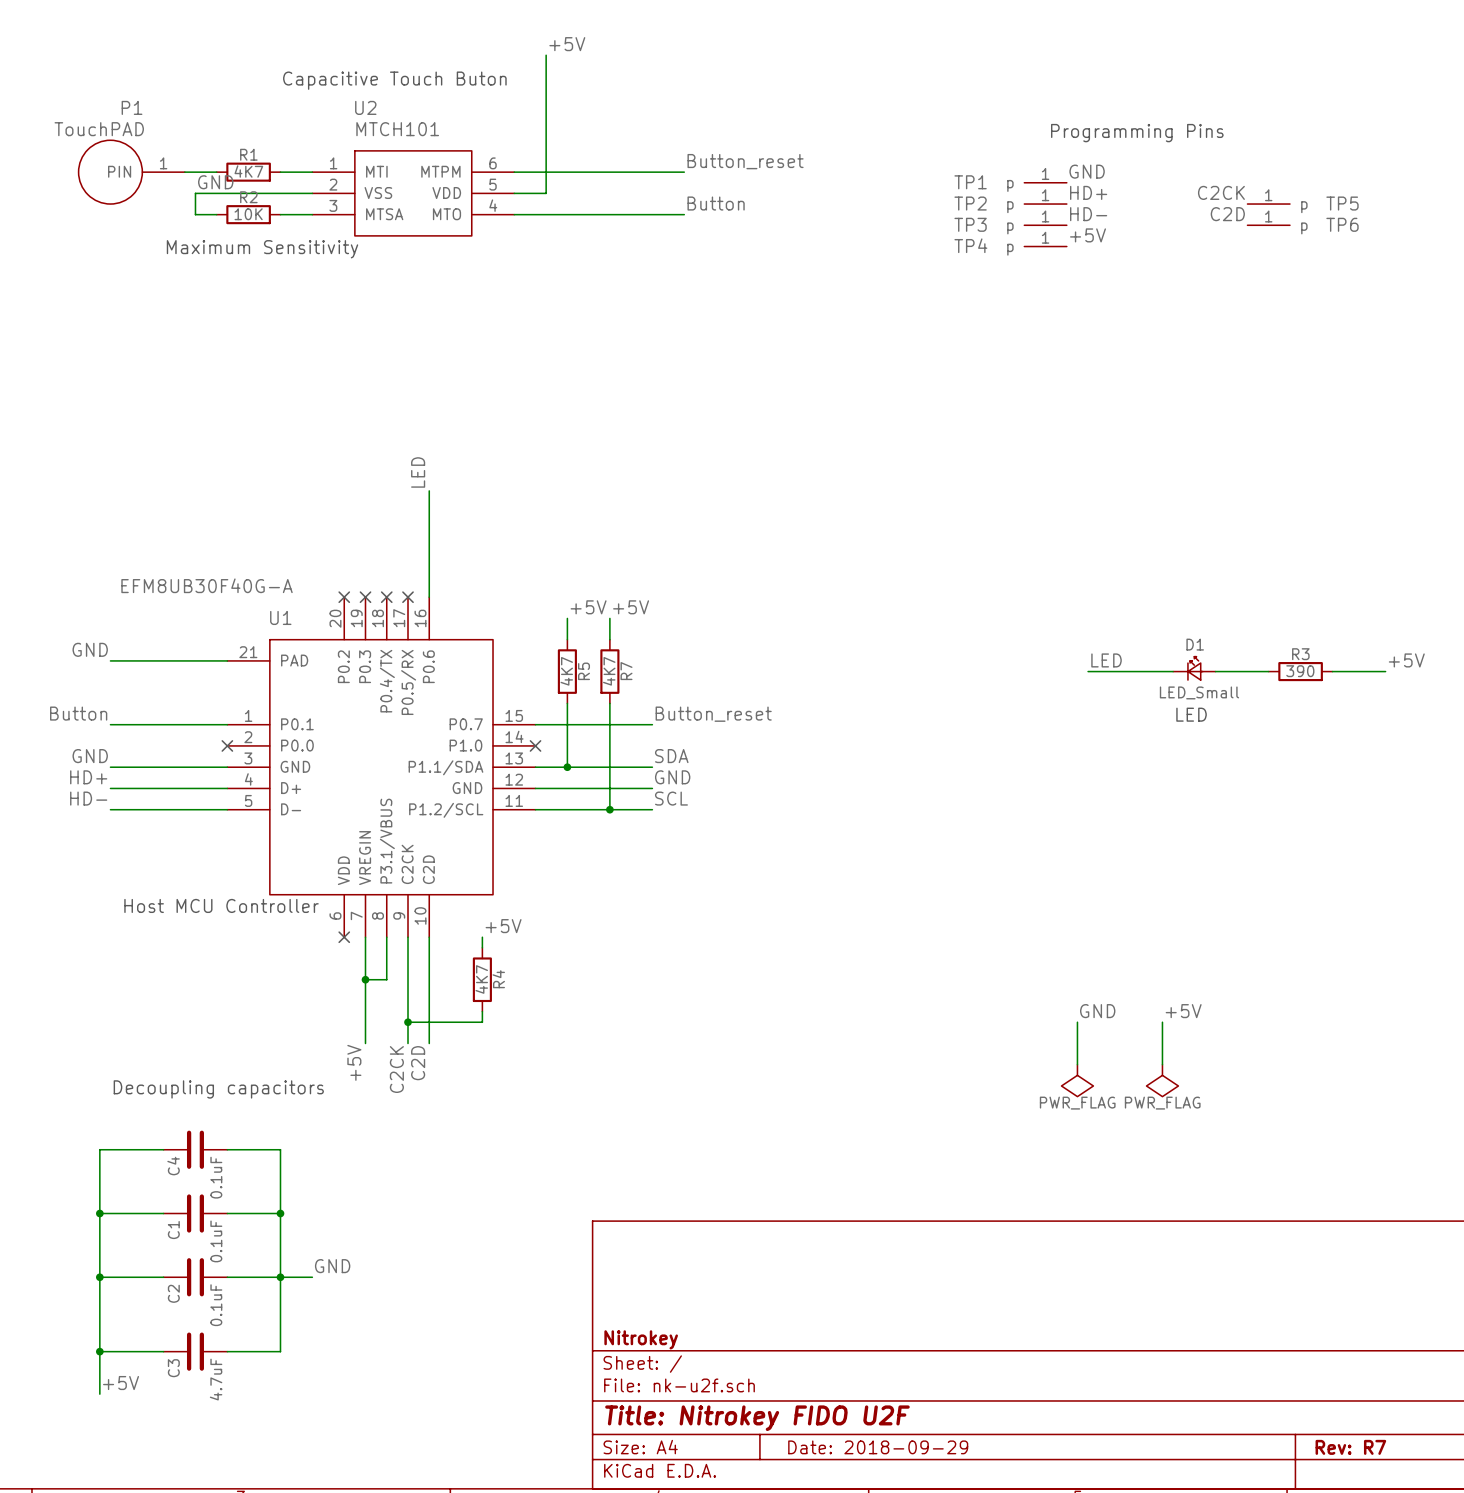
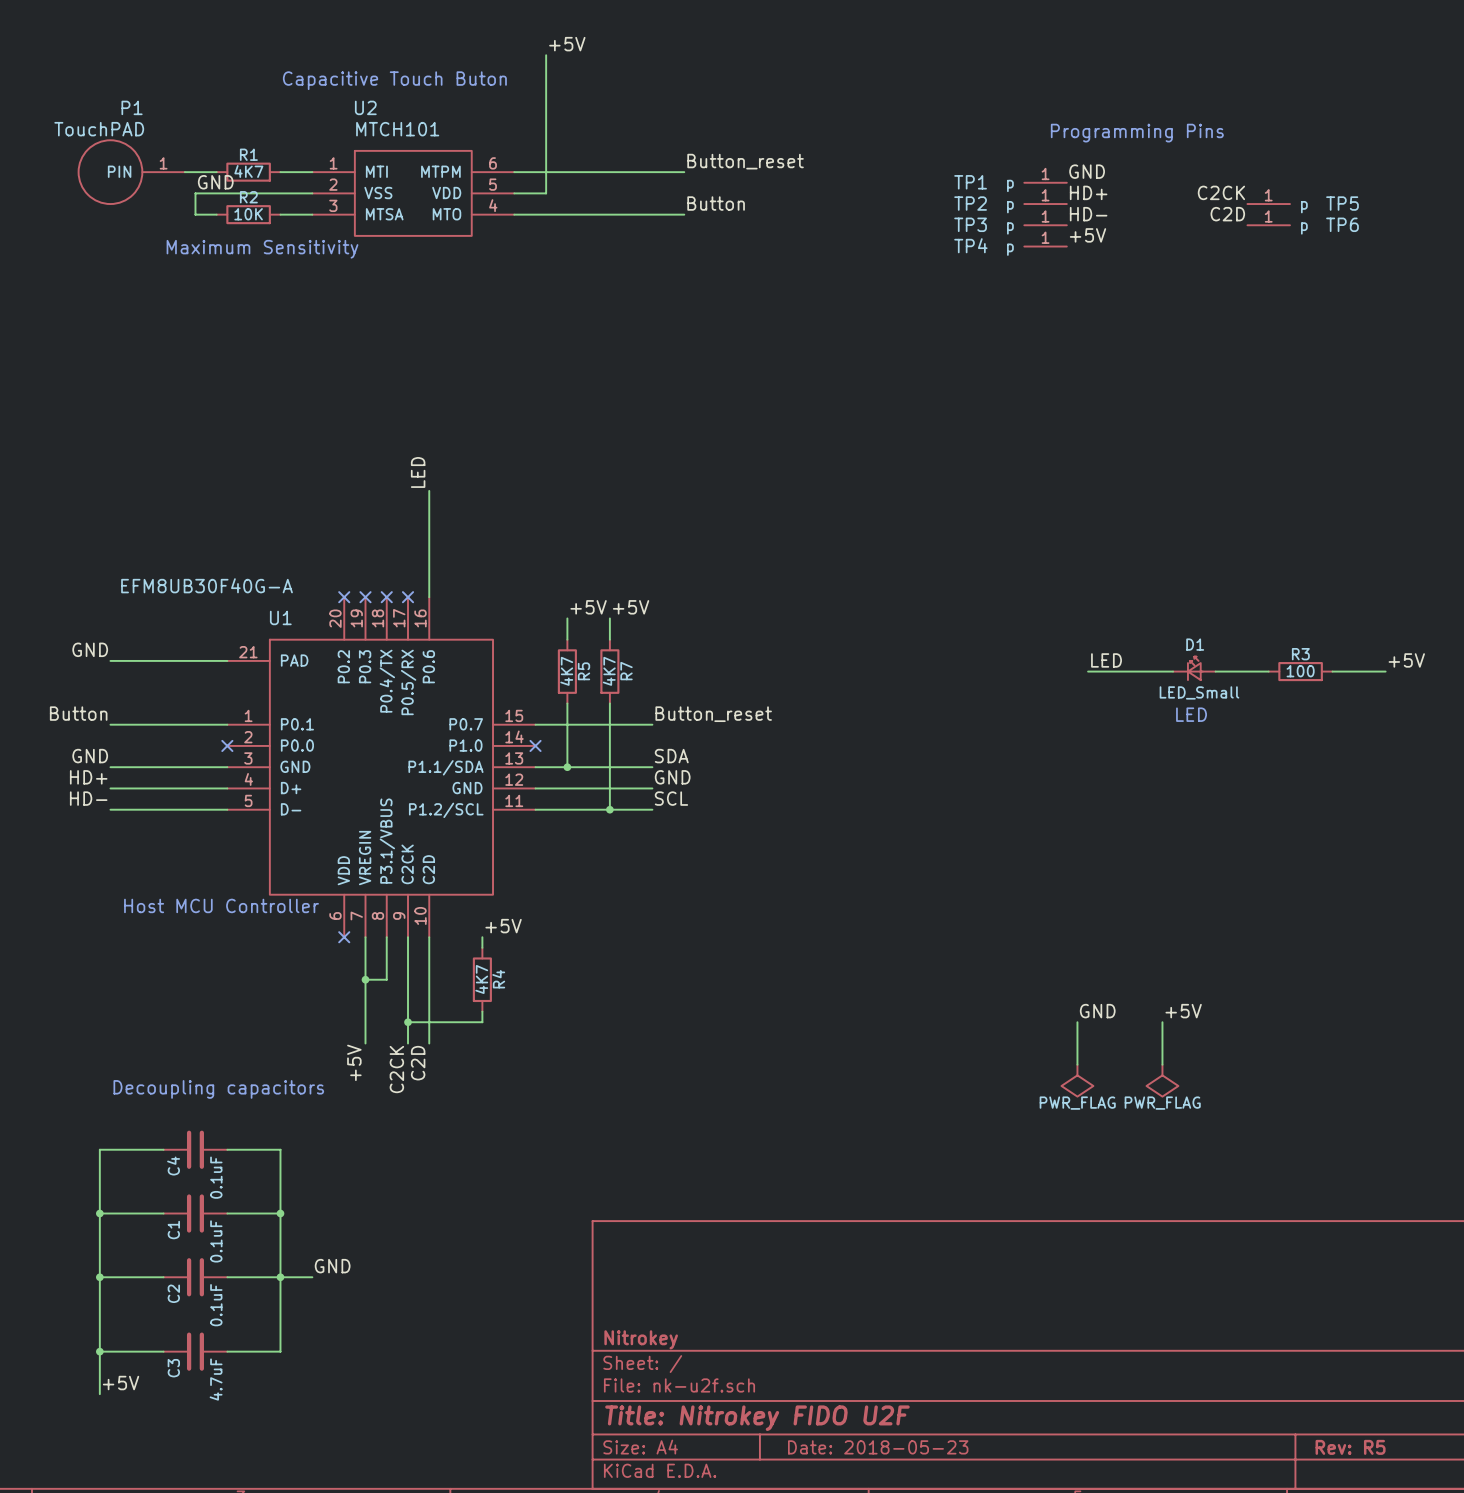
R3 value: 390 (1300, 671) -> 100 (1300, 671)
title block: Date: 2018-09-29 (878, 1447) -> Date: 2018-05-23 (878, 1447)
title block: Rev: R7 (1350, 1447) -> Rev: R5 (1350, 1447)

